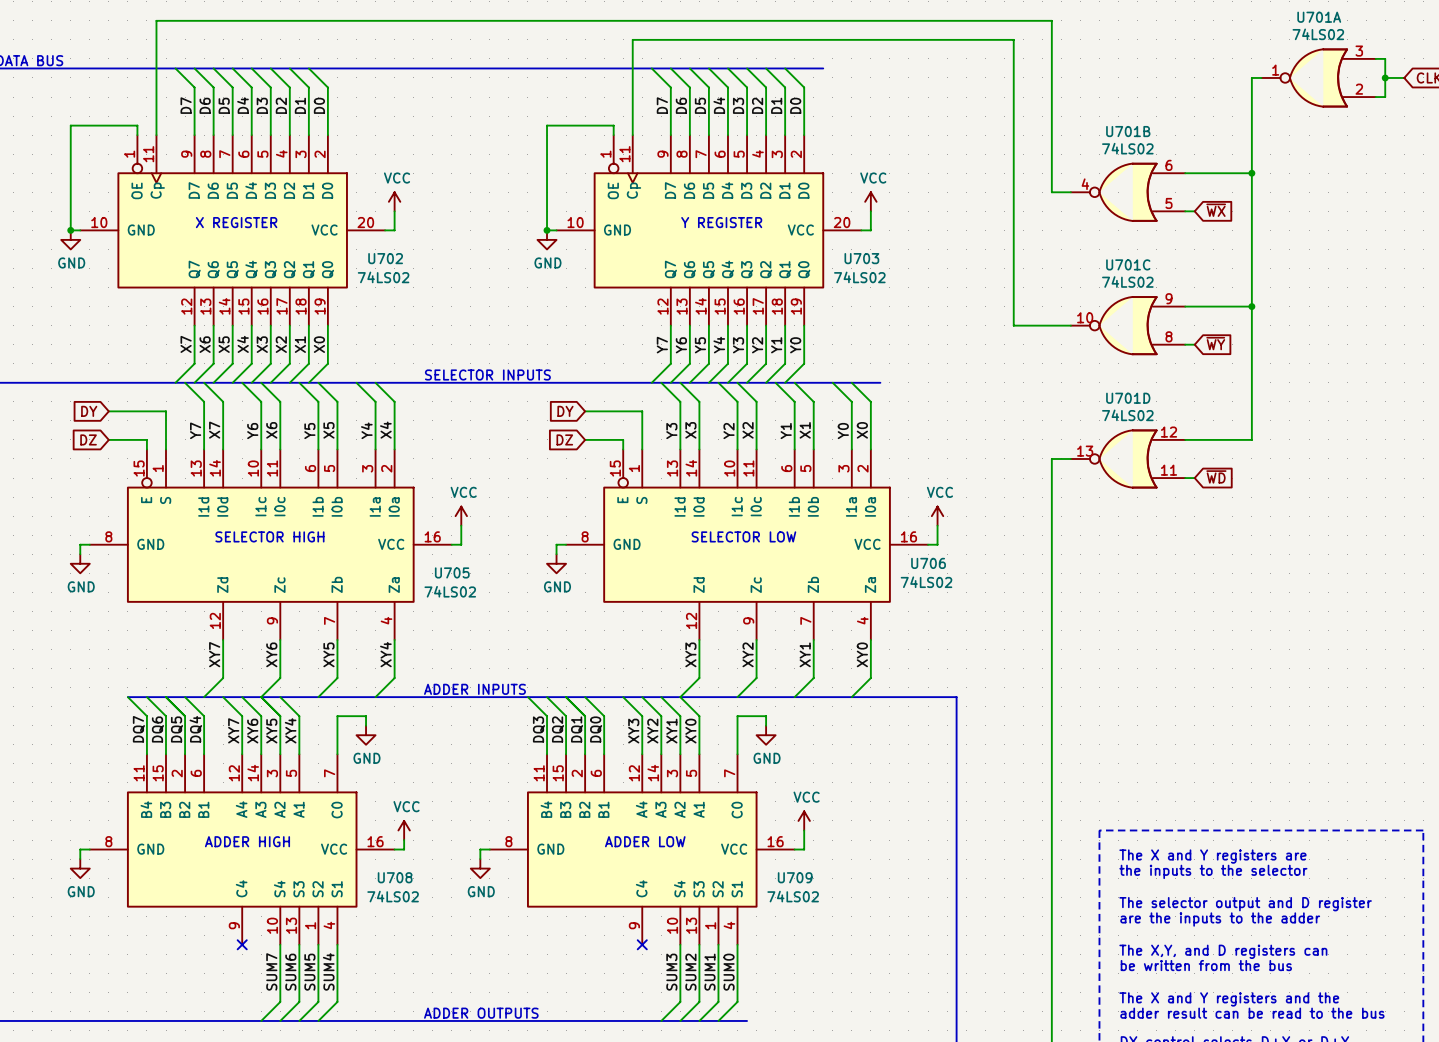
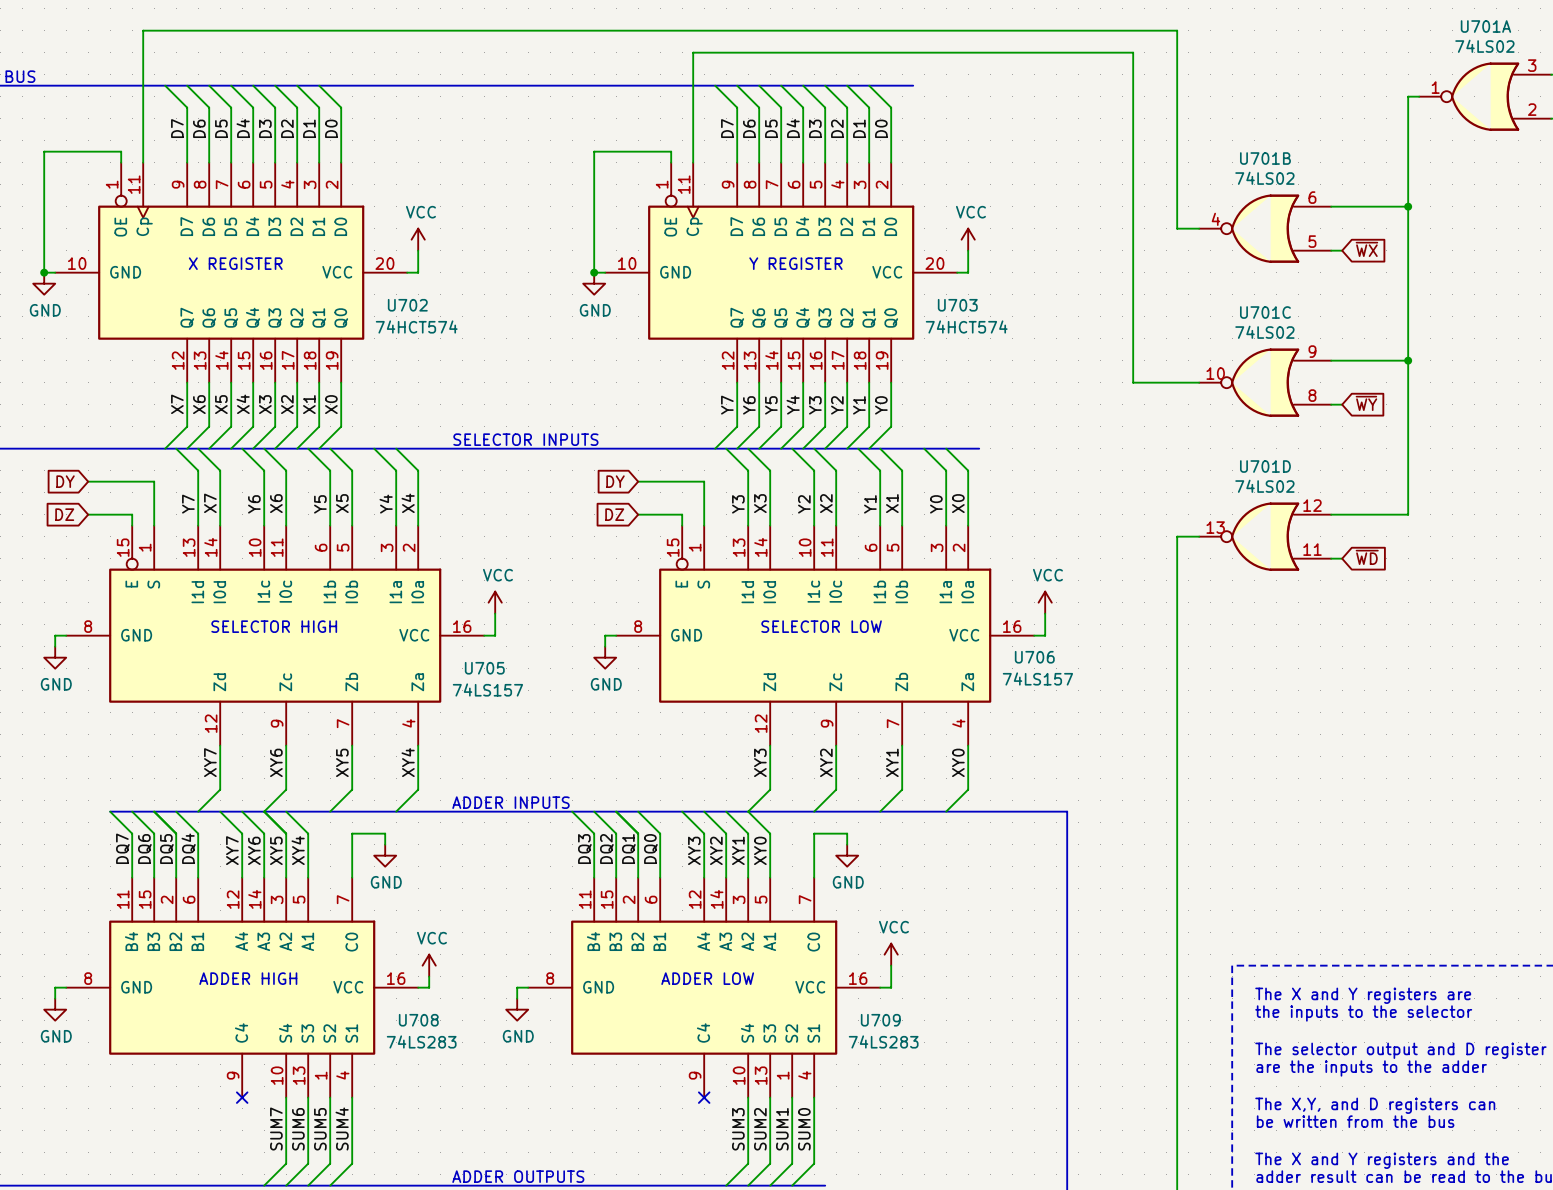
U702 value: 74LS02 (383, 277) -> 74HCT574 (416, 326)
U703 value: 74LS02 (859, 277) -> 74HCT574 (966, 326)
U706 value: 74LS02 (926, 582) -> 74LS157 (1037, 678)
U705 value: 74LS02 (450, 591) -> 74LS157 (487, 689)
U708 value: 74LS02 (393, 896) -> 74LS283 (421, 1041)
U709 value: 74LS02 (793, 896) -> 74LS283 (883, 1041)

